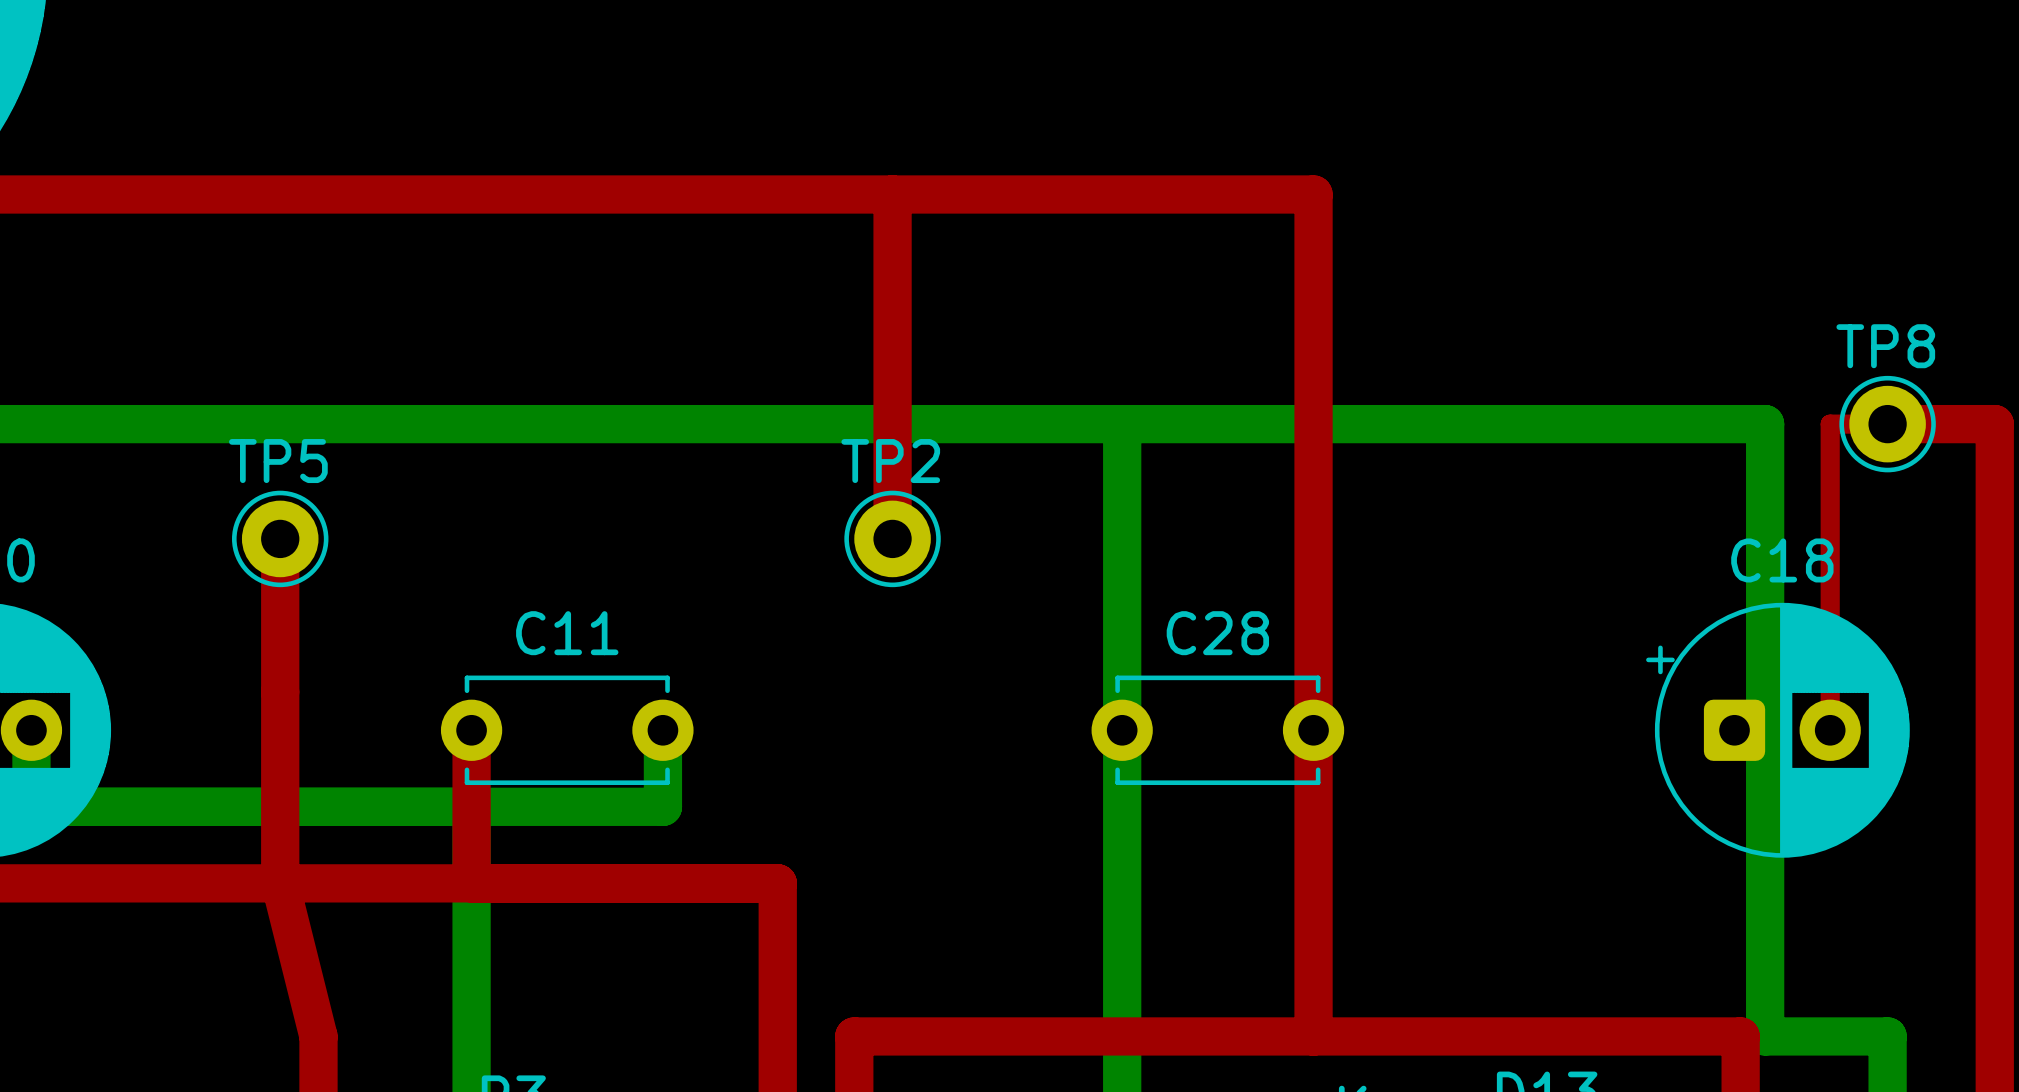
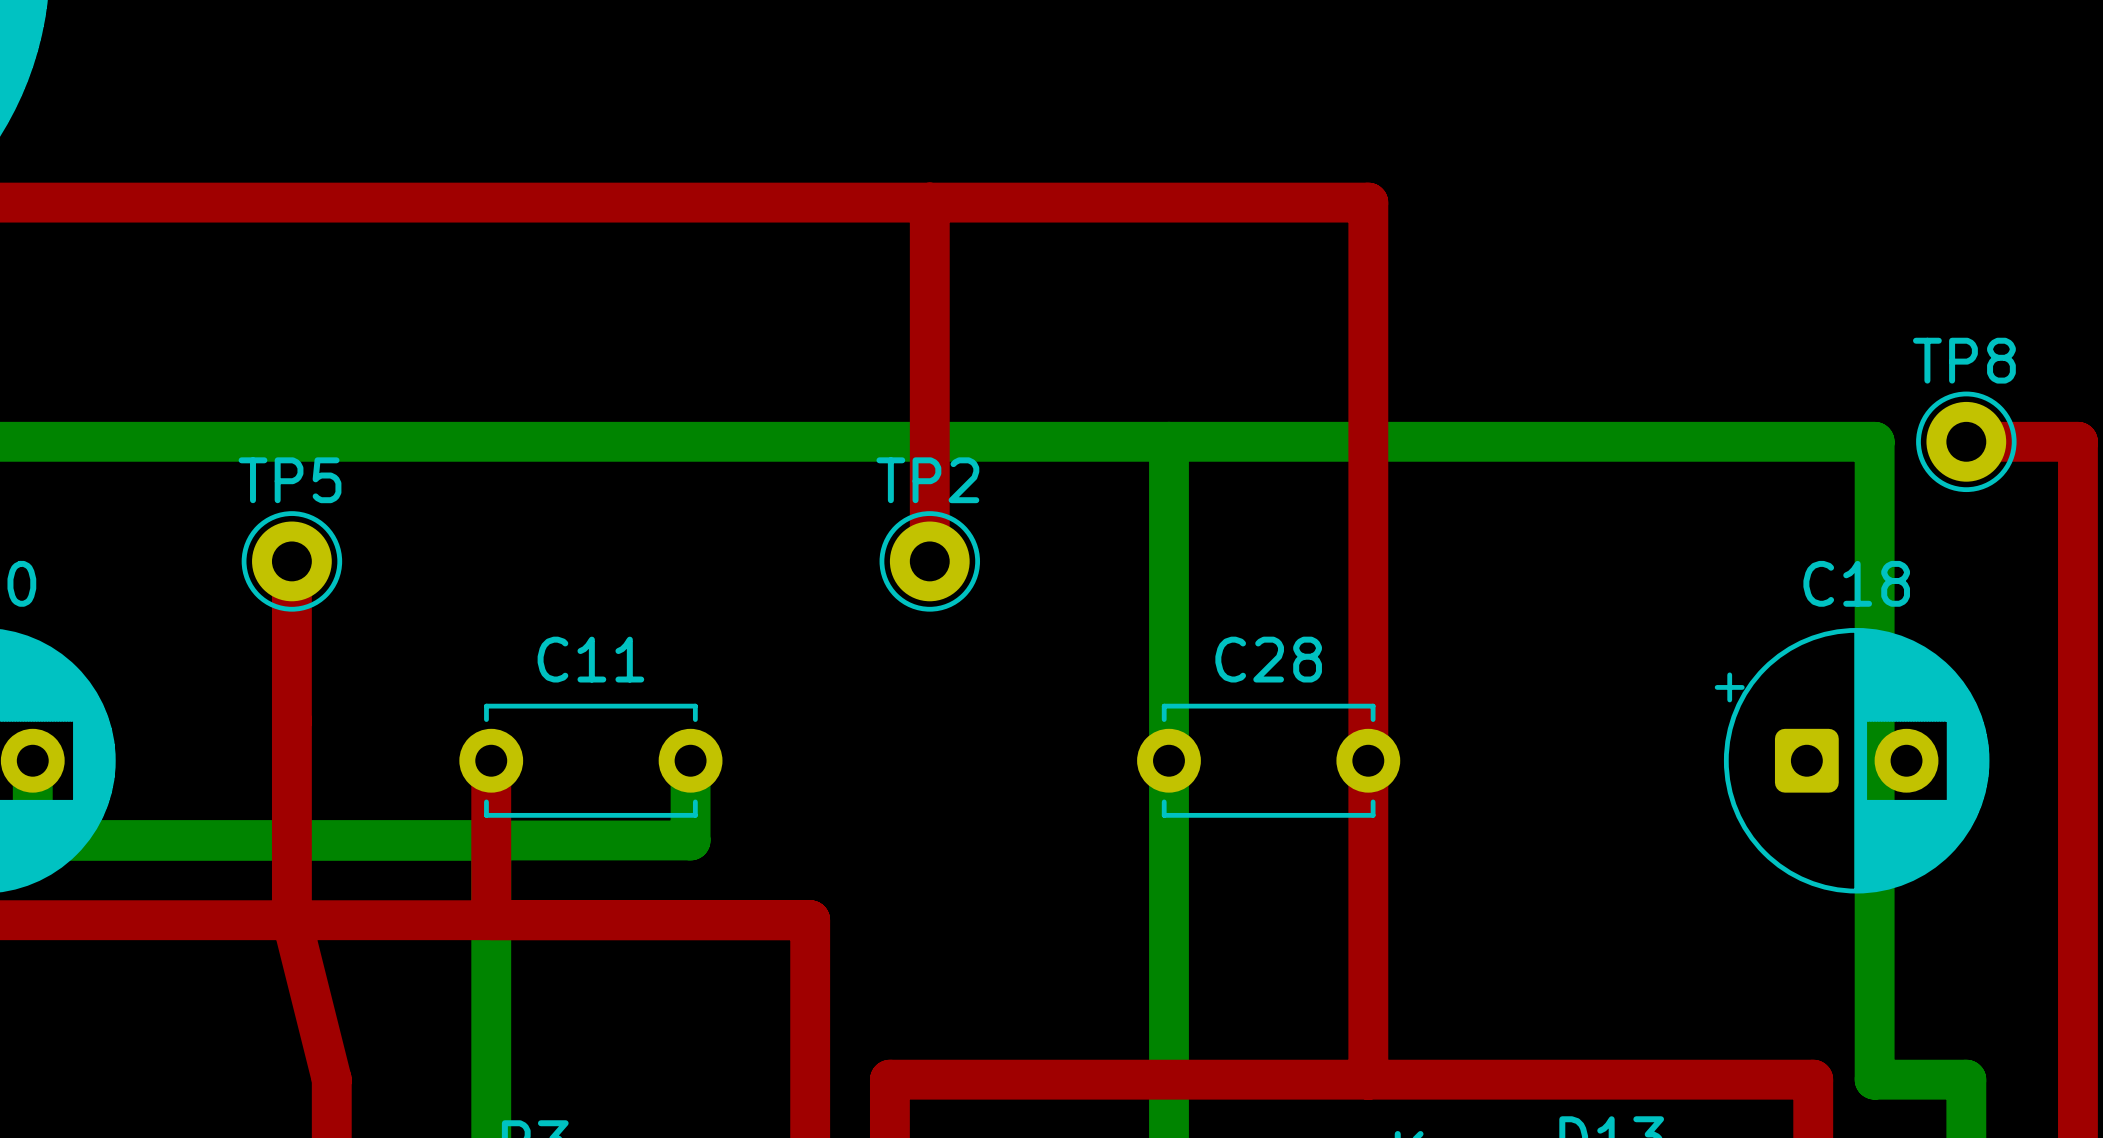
bottom track: (1765, 424) (1765, 1036) (1799, 1036) -> (1838, 441) (1874, 441) (1874, 1079)
top track: (1887, 424) (1830, 424) (1830, 730) -> none

